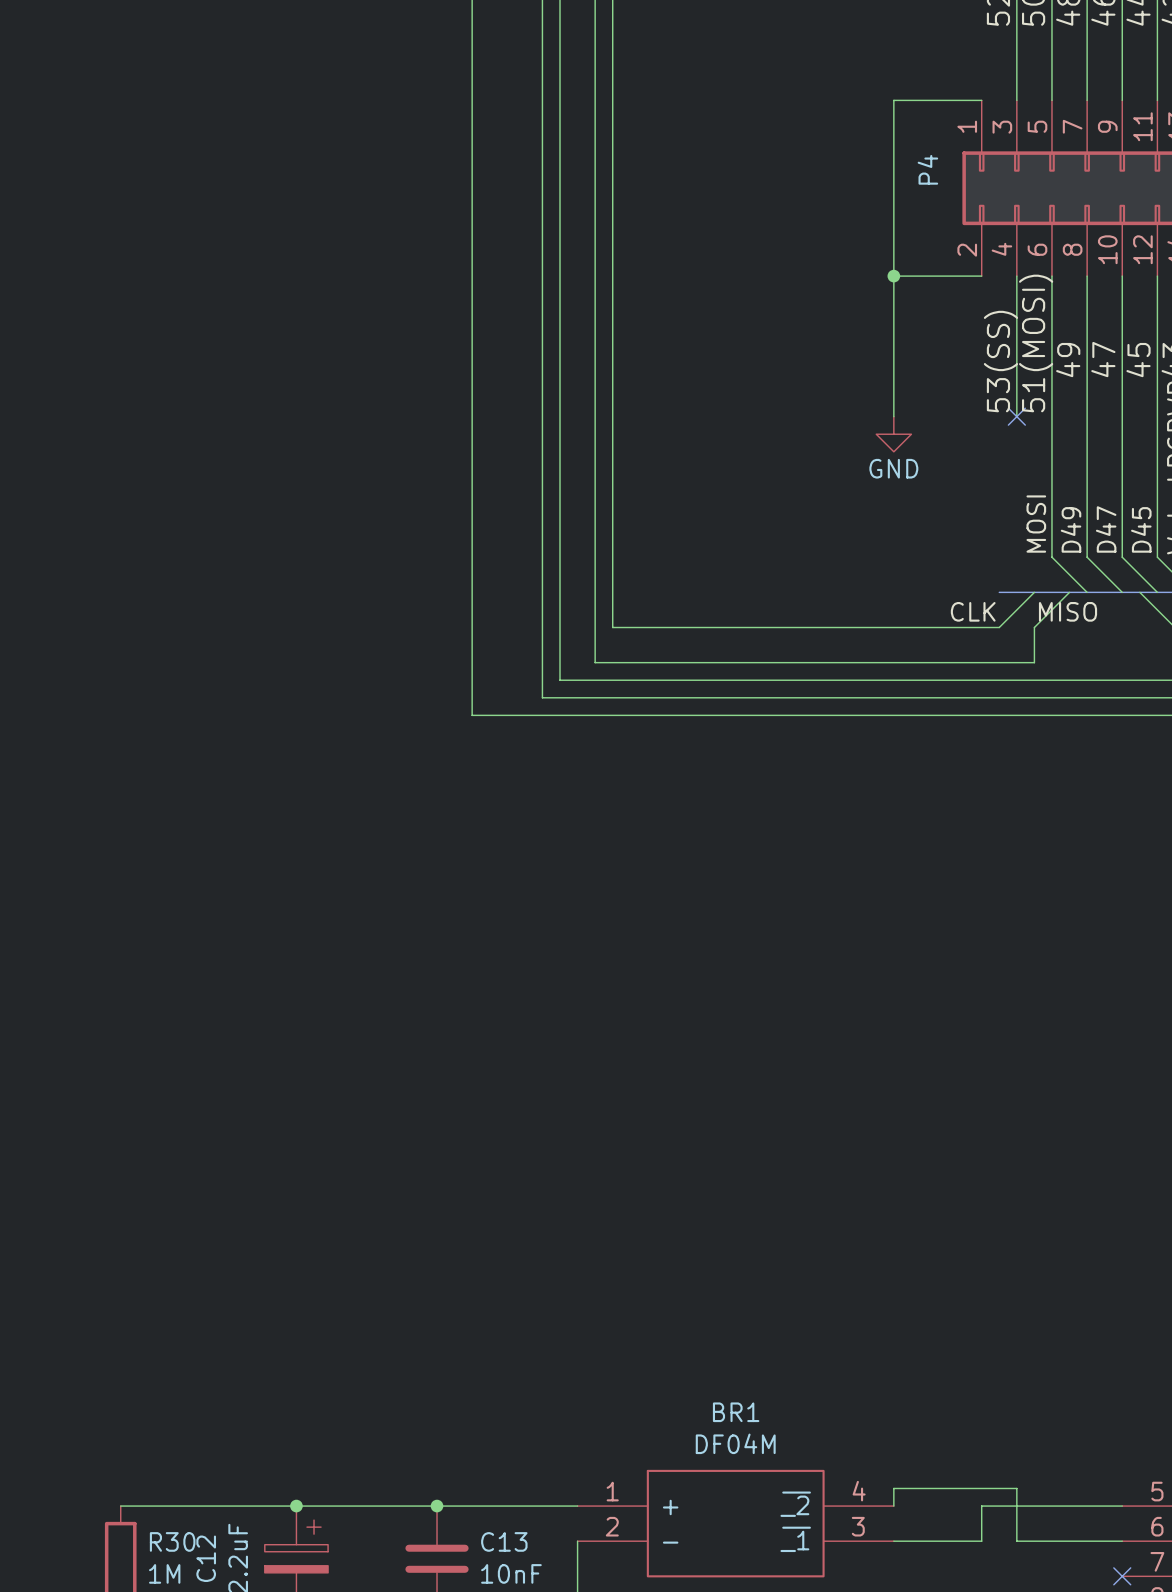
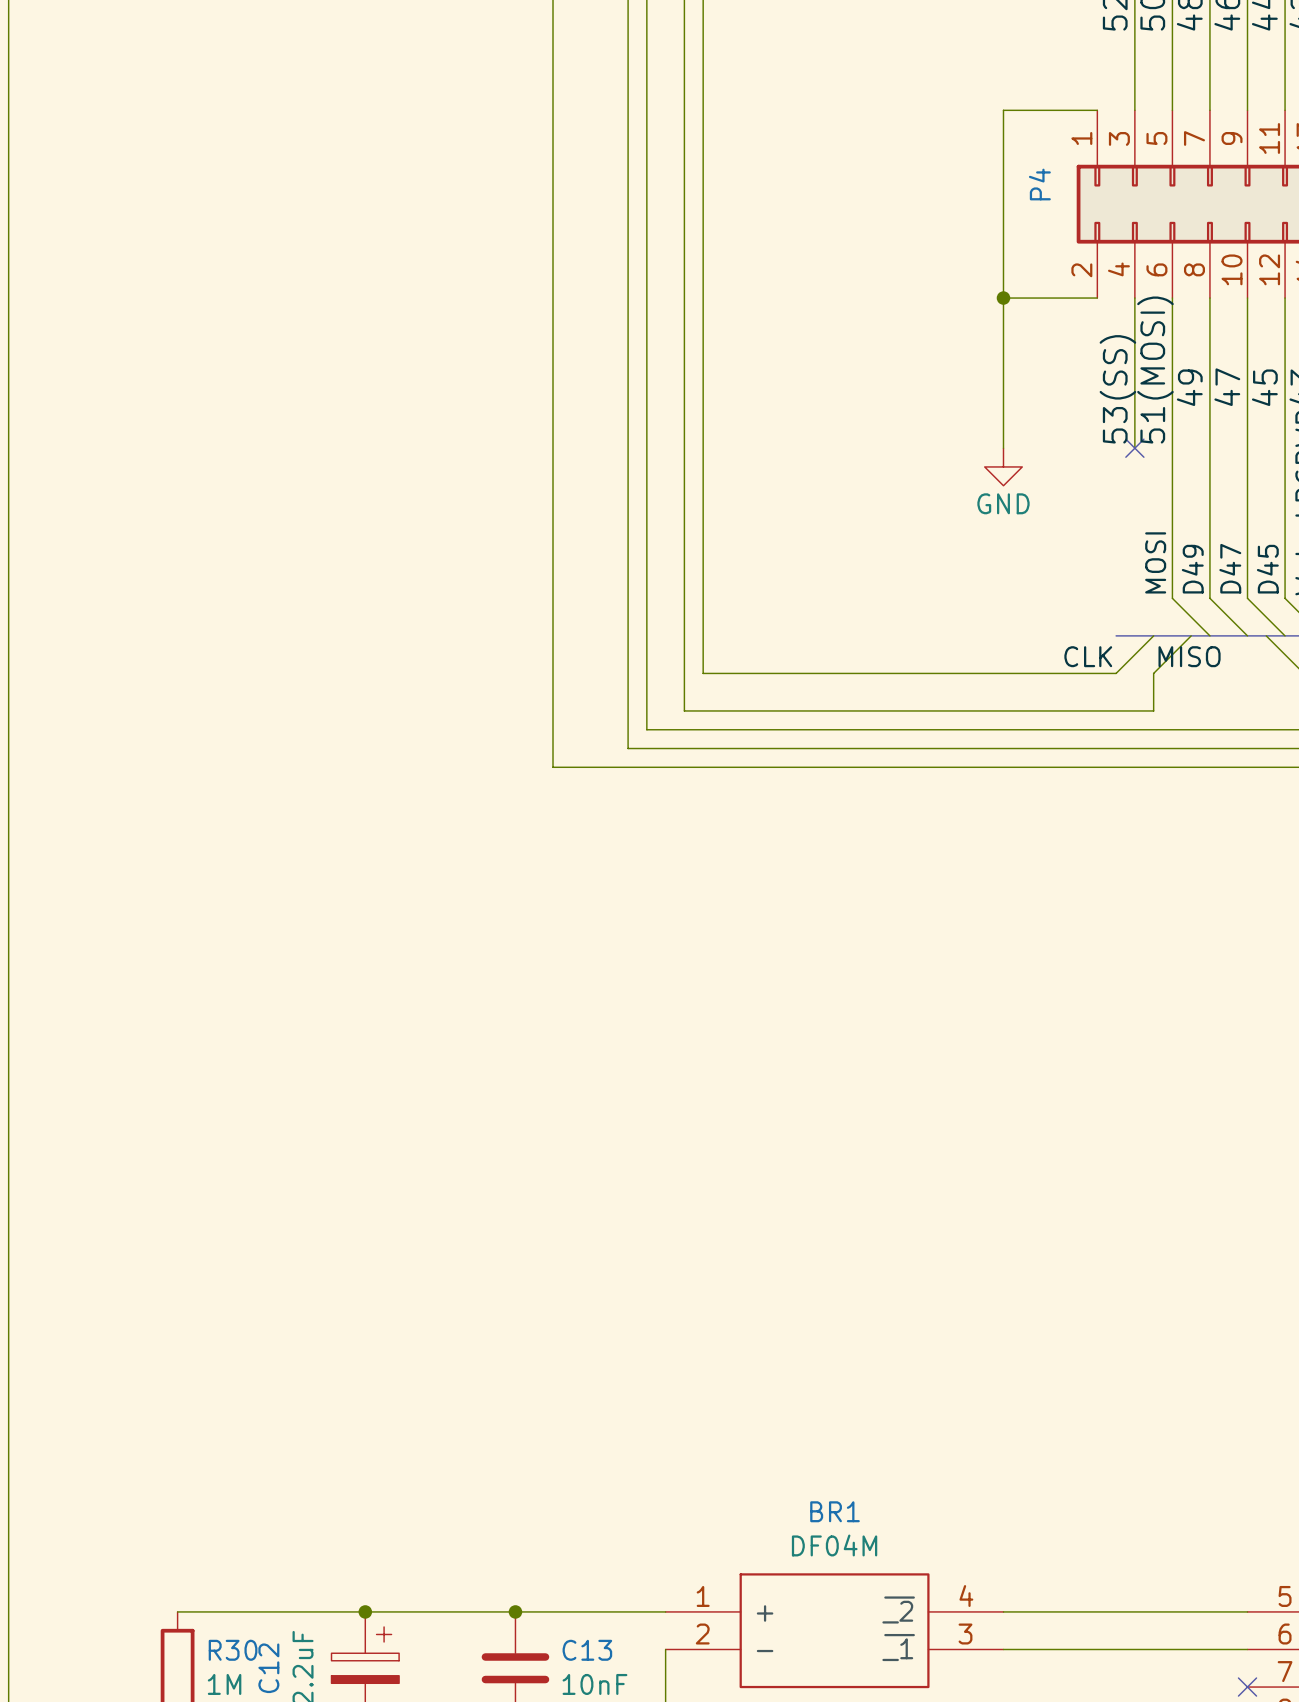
wire: (893, 1506) (893, 1488) (1016, 1488) (1016, 1541) -> (1003, 1611) (1097, 1611)
wire: (981, 1506) (981, 1541) -> (1134, 1649) (1097, 1649)

